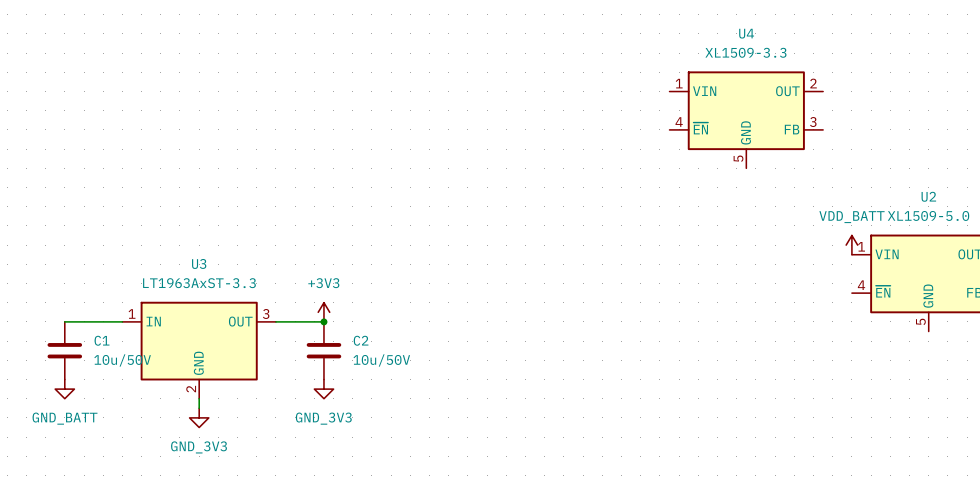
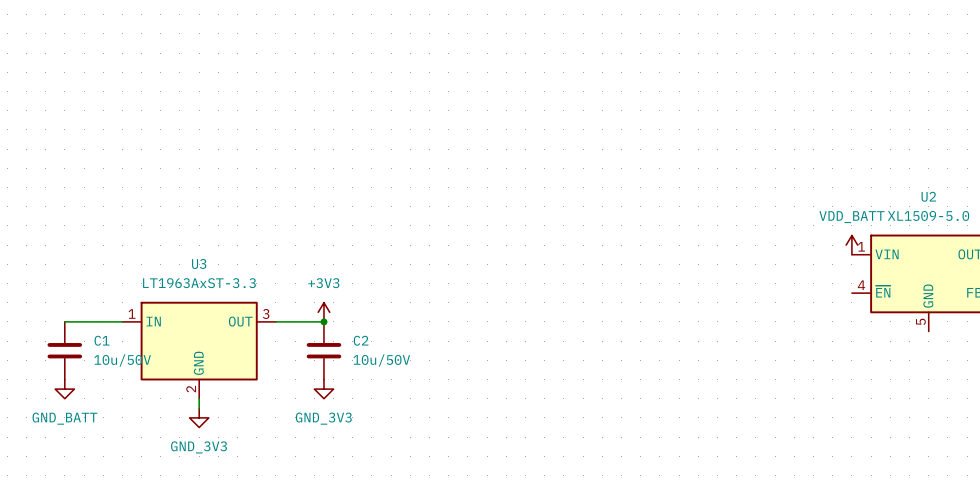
U4: XL1509-3.3 (746, 119) -> none

